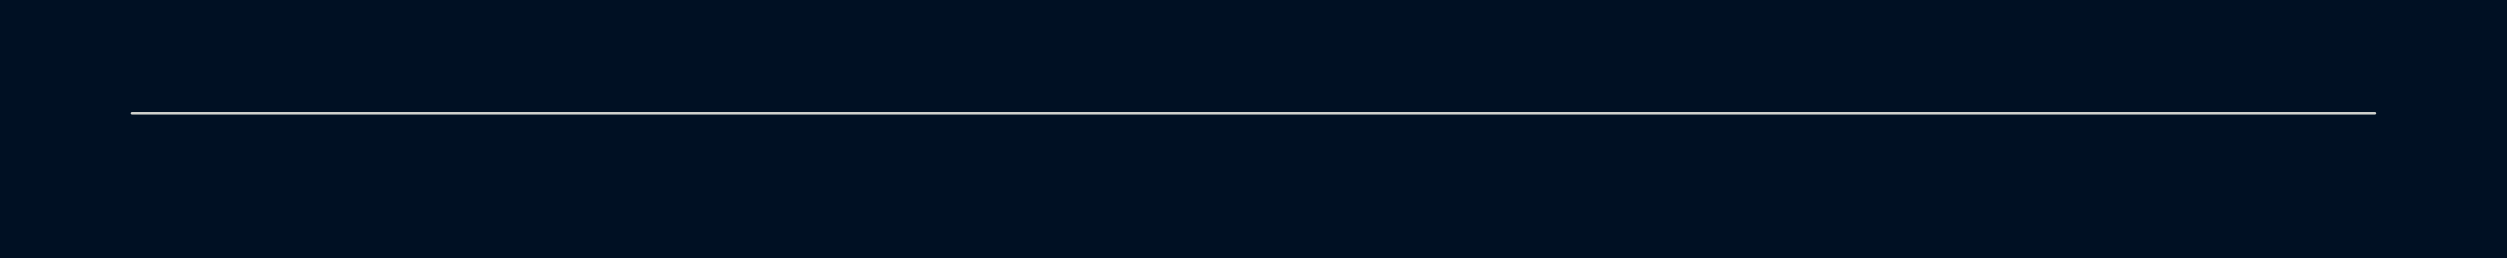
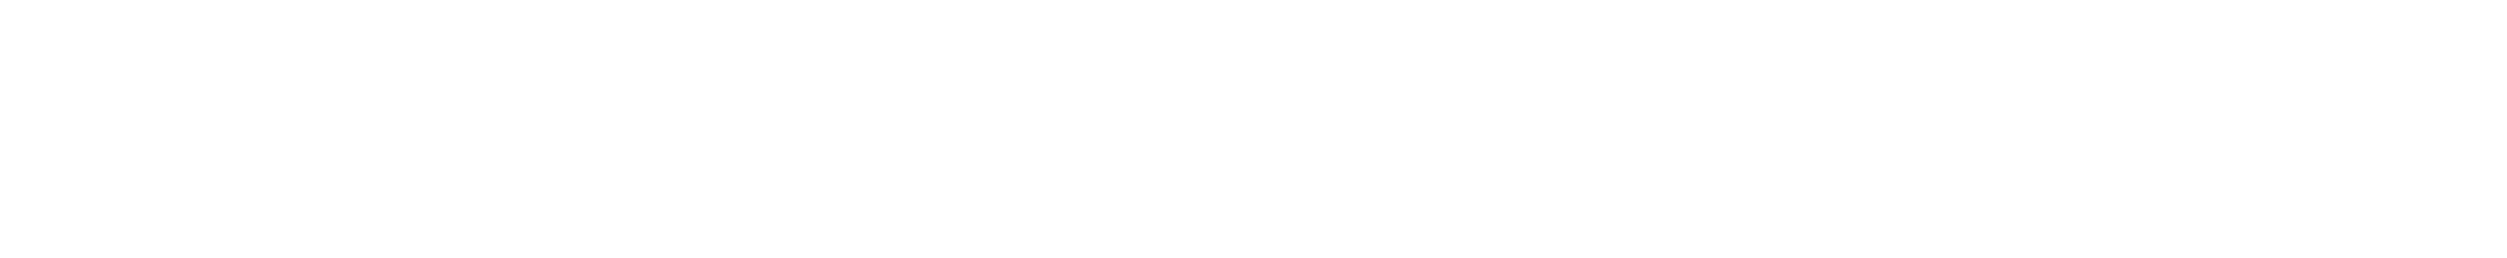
board edge: (2374, 113) (131, 113) -> none

